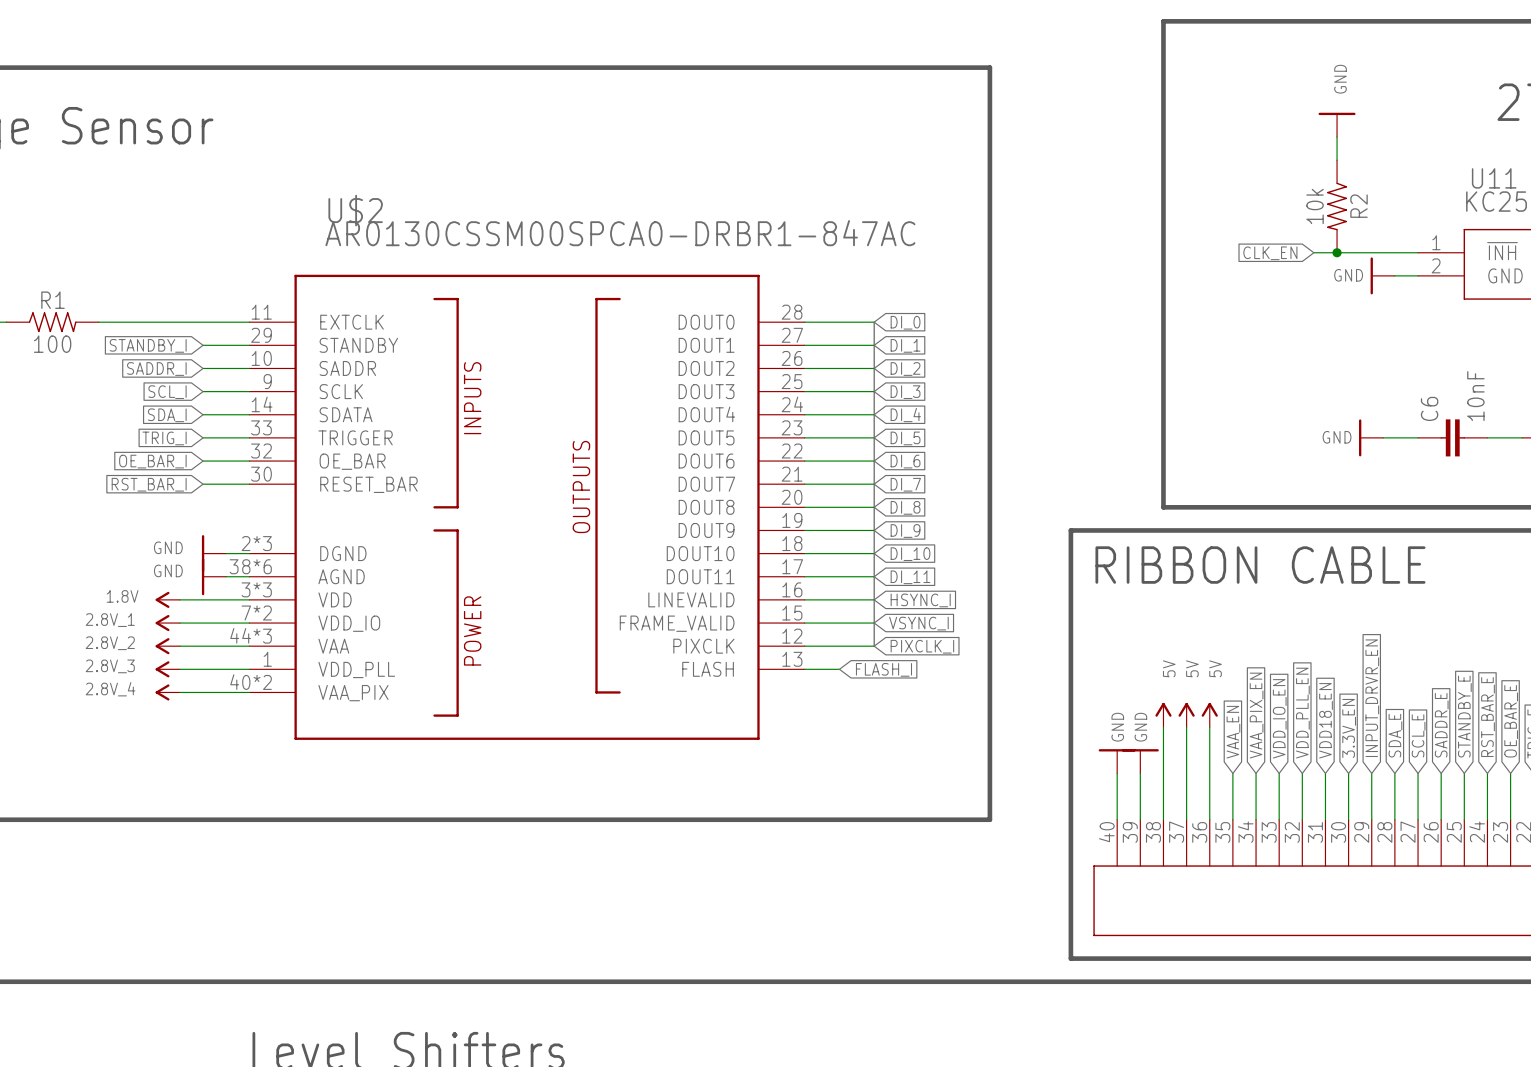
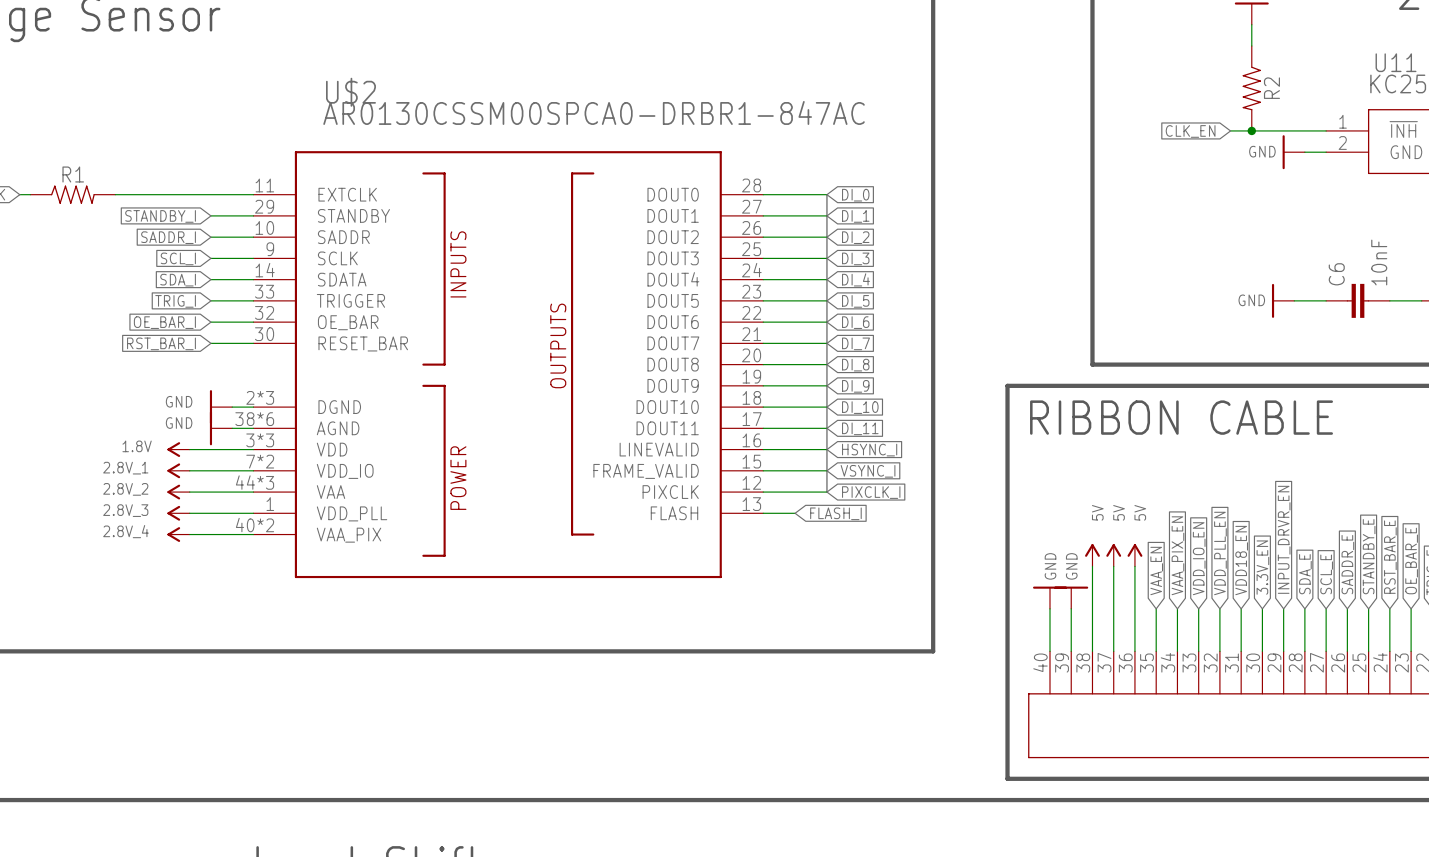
R2 value: 10k (1315, 206) -> none
R1 value: 100 (52, 344) -> none

